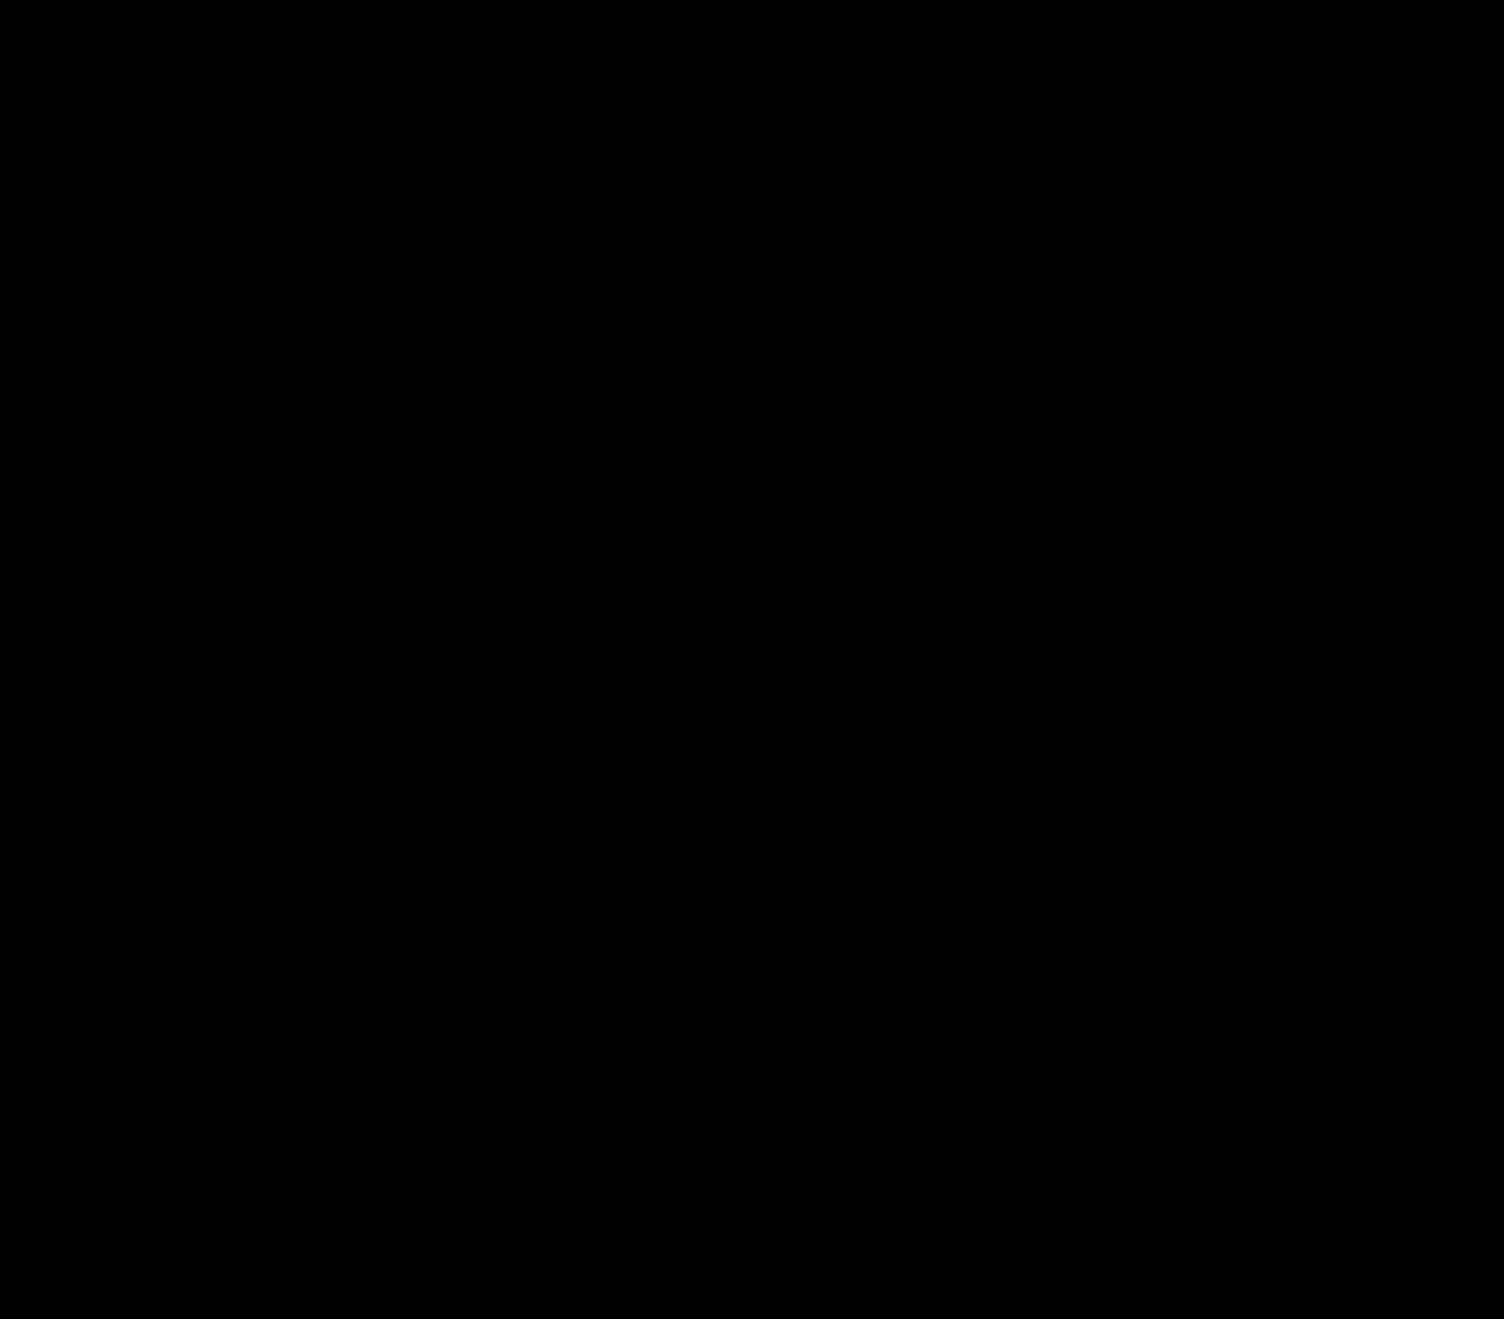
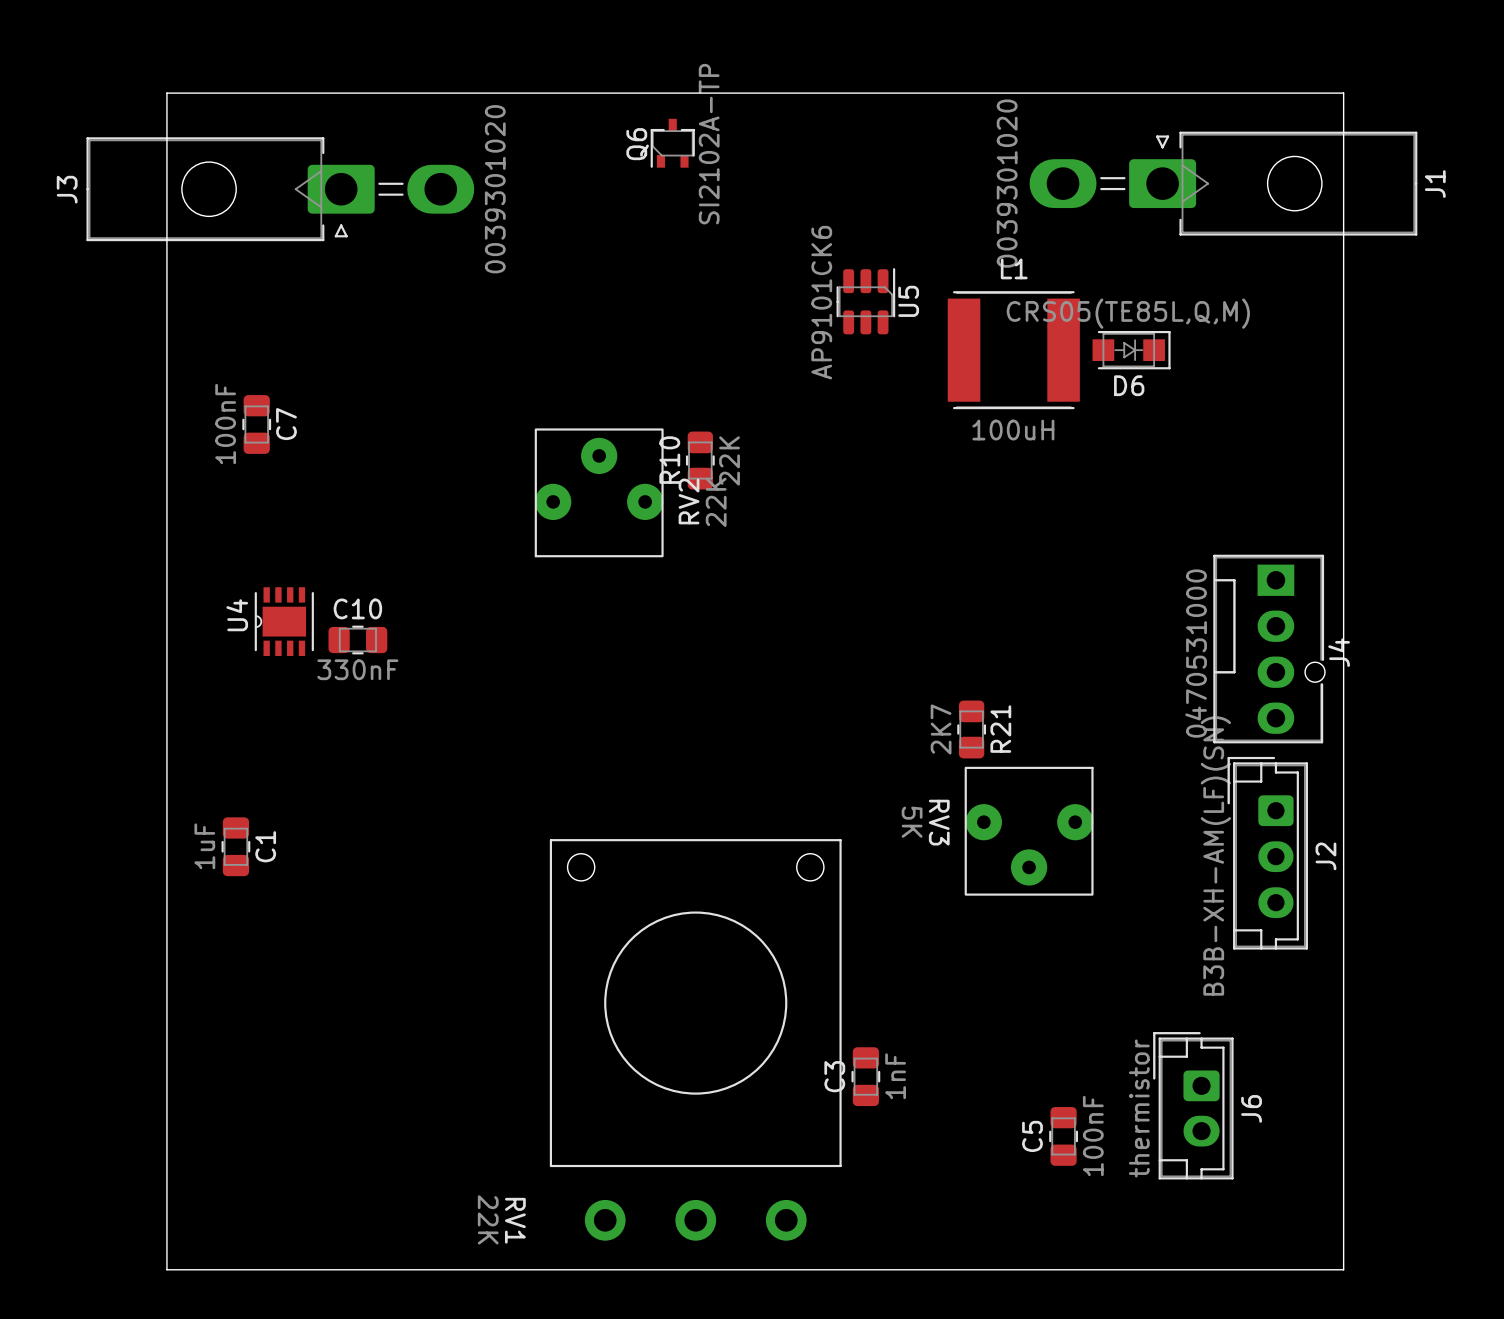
board edge: none -> (166, 93) (1343, 93) (1343, 1269) (166, 1269) (166, 93)
Q6: none -> SI2102A-TP (672, 143)
J1: none -> 0039301020 (1223, 183)
J3: none -> 0039301020 (280, 189)
U5: none -> AP9101CK6 (865, 301)
L1: none -> 100uH (1013, 350)
D6: none -> CRS05(TE85L,Q,M) (1131, 350)
C7: none -> 100nF (256, 424)
R10: none -> 22K (700, 460)
RV2: none -> 22K (599, 492)
U4: none -> (284, 621)
C10: none -> 330nF (357, 640)
J4: none -> 0470531000 (1269, 649)
R21: none -> 2K7 (971, 729)
RV3: none -> 5K (1029, 831)
C1: none -> 1uF (235, 846)
J2: none -> B3B-XH-AM(LF)(SN) (1267, 853)
RV1: none -> 22K (695, 1039)
C3: none -> 1nF (865, 1076)
J6: none -> thermistor (1193, 1105)
C5: none -> 100nF (1063, 1136)

